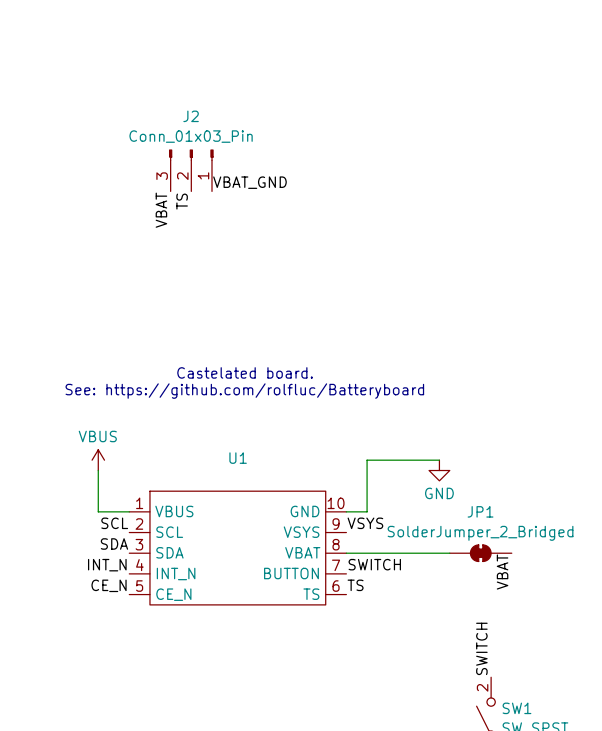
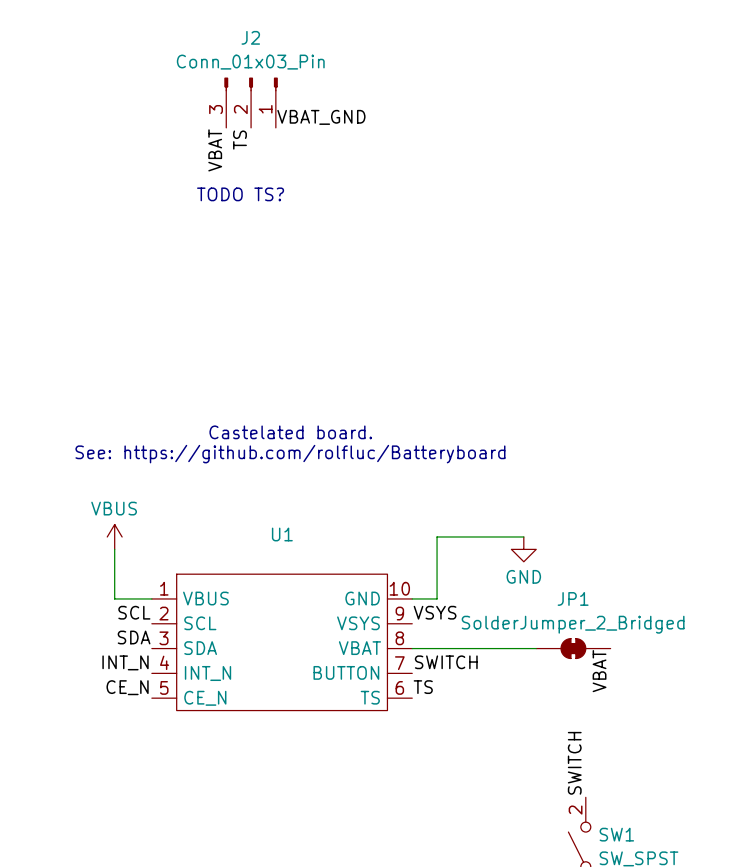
J2 position: (191, 170) -> (251, 102)
text: none -> TODO TS? (240, 194)
label position: VBAT_GND (249, 182) -> VBAT_GND (321, 117)
label position: TS (182, 201) -> TS (240, 140)
label position: VBAT (161, 210) -> VBAT (215, 150)

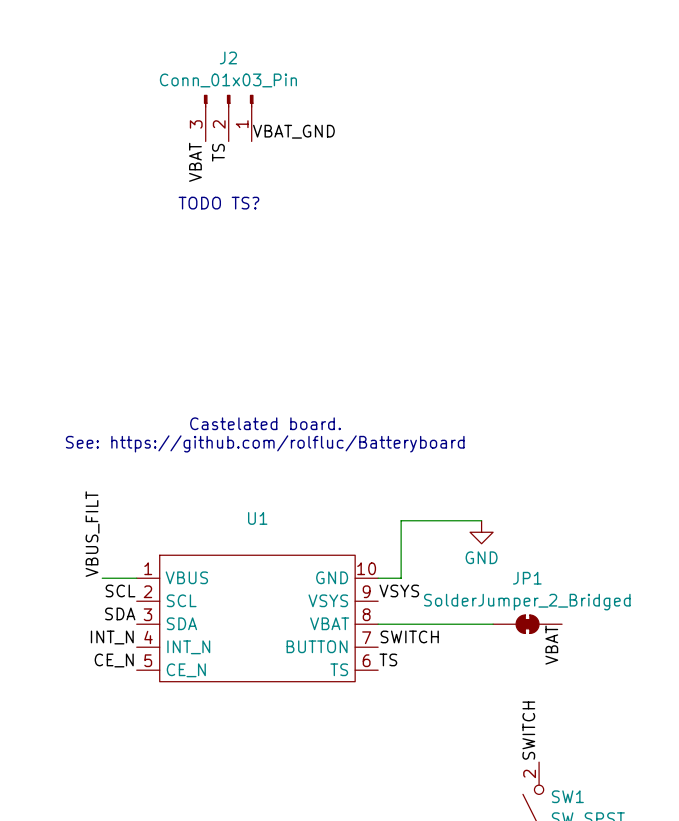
power symbol: VBUS (114, 536) -> none
wire: (114, 549) (114, 598) -> none
label: none -> VBUS_FILT (92, 534)

